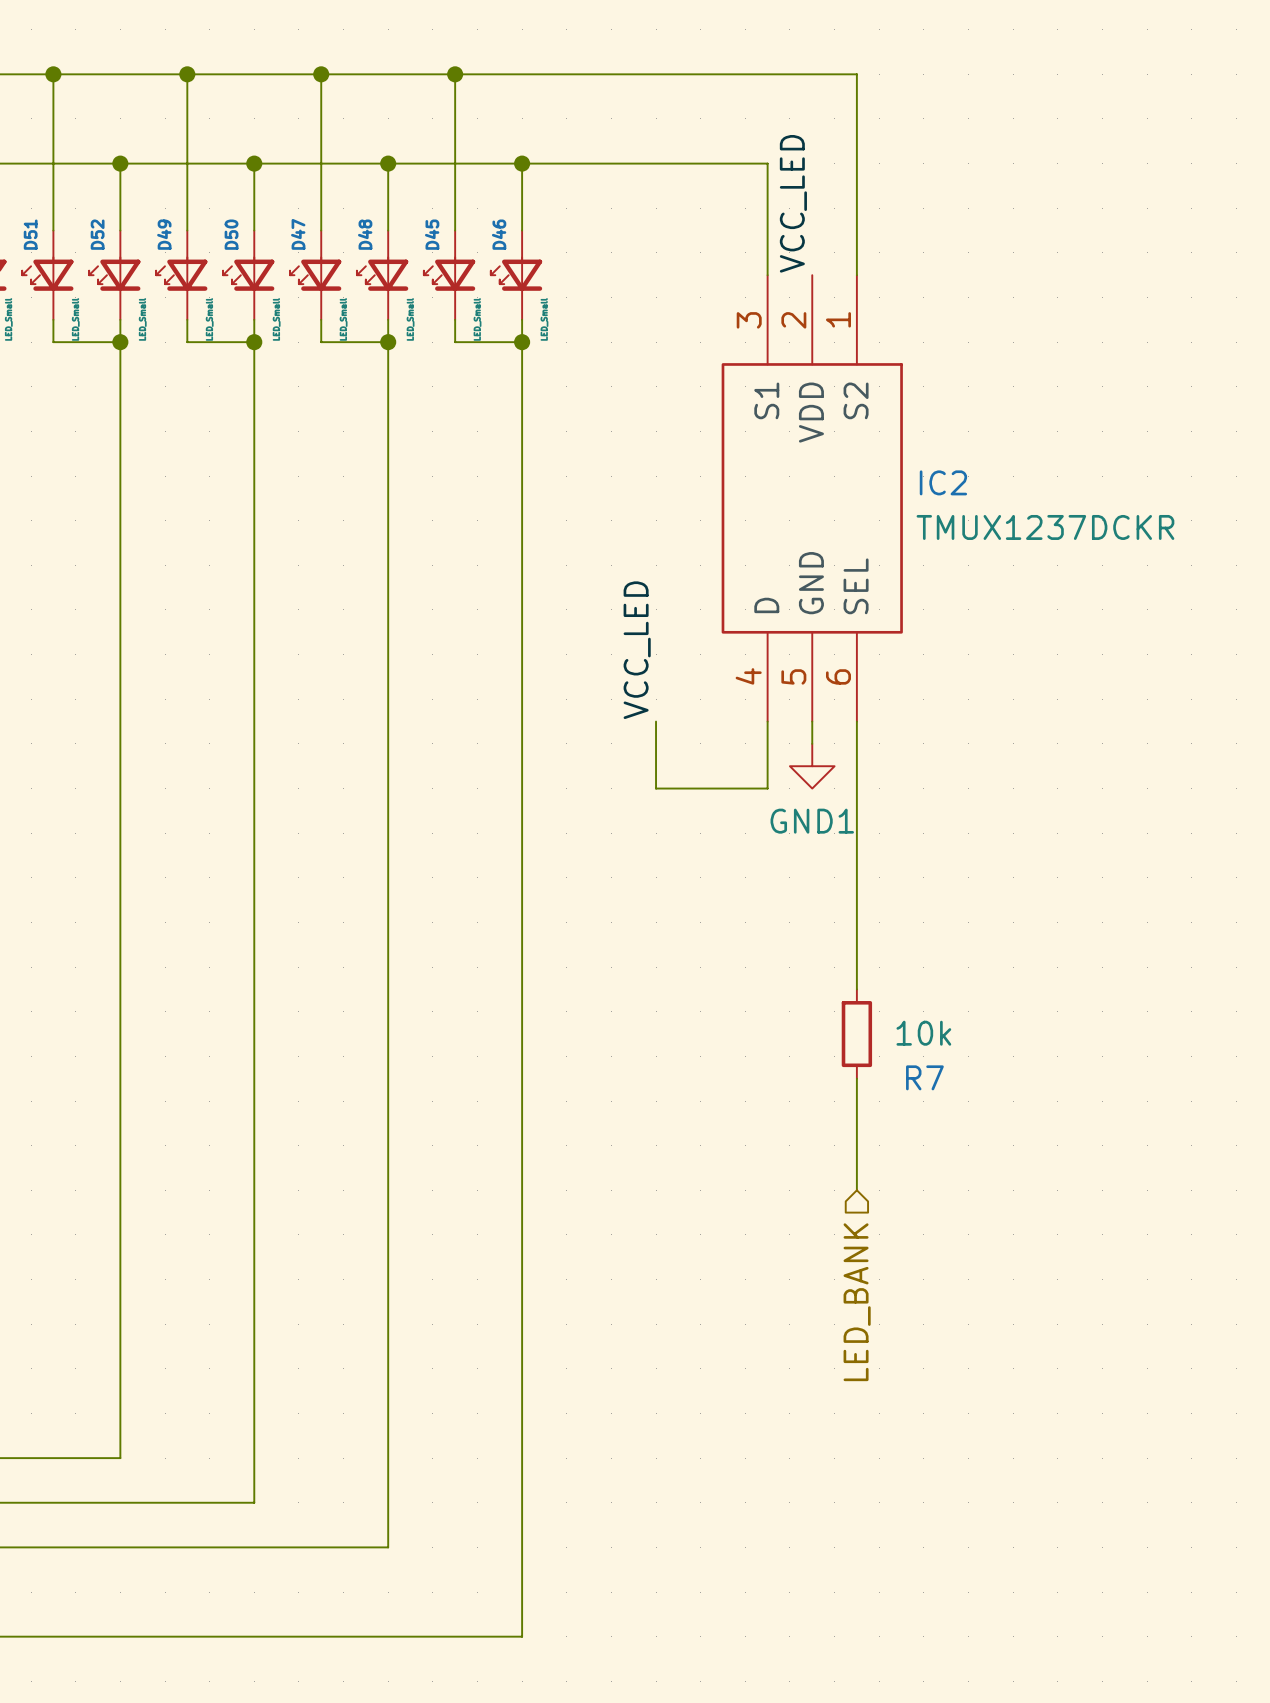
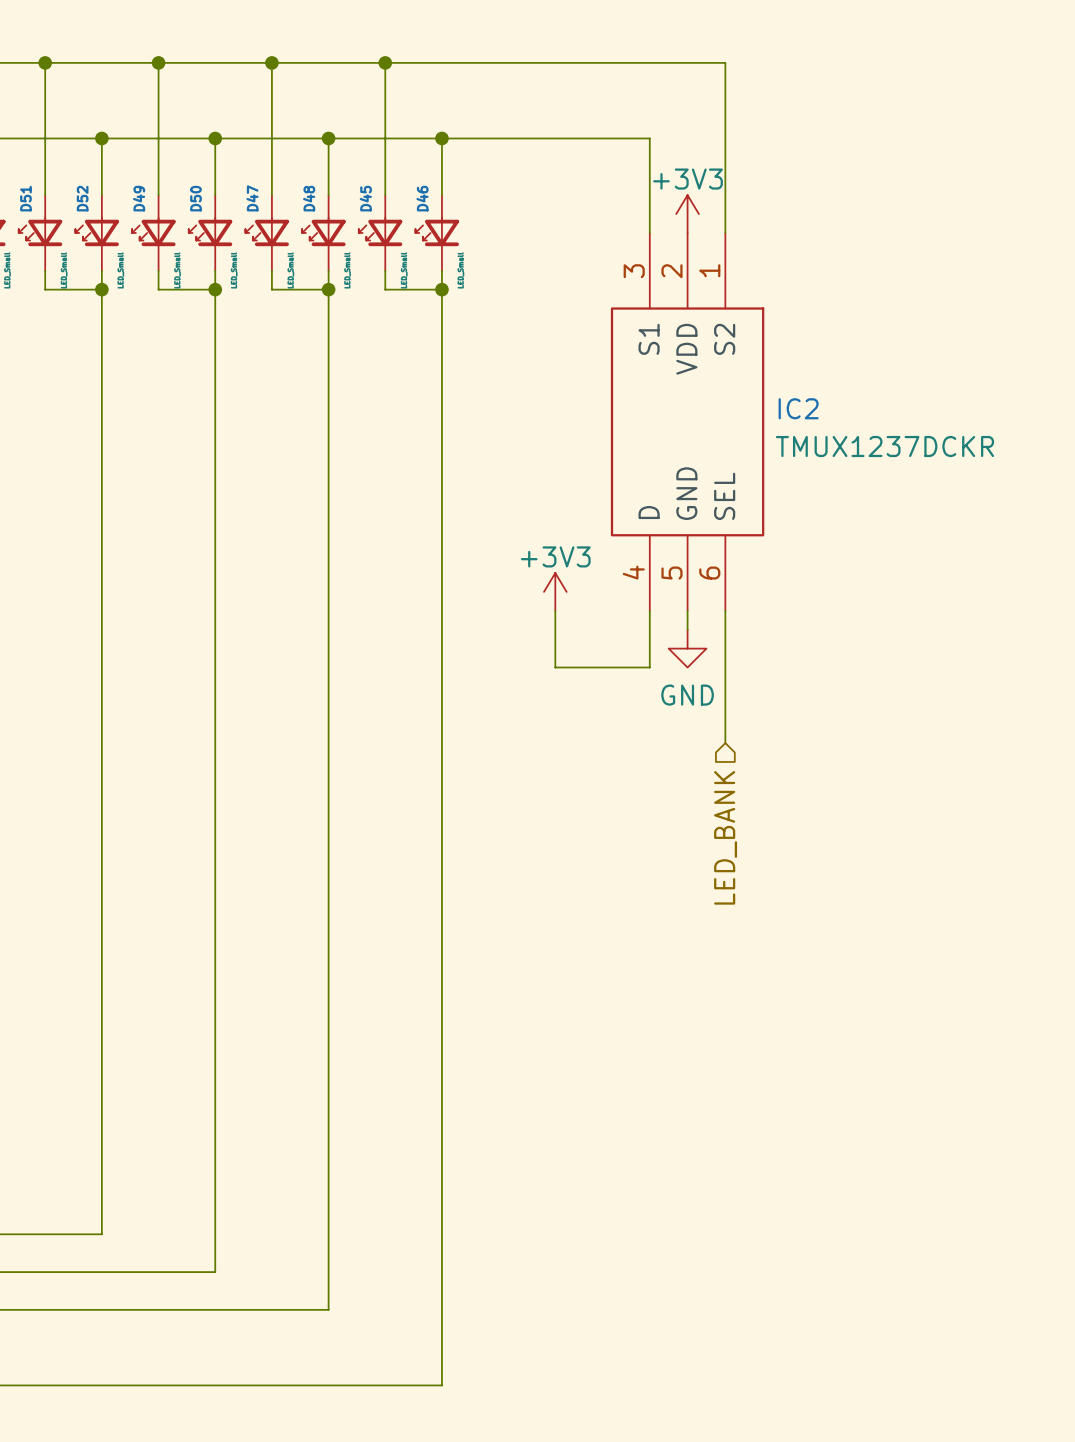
label: VCC_LED (793, 203) -> none
power symbol: none -> +3V3 (687, 214)
label: VCC_LED (637, 650) -> none
power symbol: none -> +3V3 (555, 591)
power symbol: GND1 (812, 766) -> GND (687, 648)
wire: (856, 877) (856, 989) -> none
R7: 10k (856, 1034) -> none
wire: (856, 1078) (856, 1190) -> none
hierarchical label position: LED_BANK (857, 1302) -> LED_BANK (725, 837)

